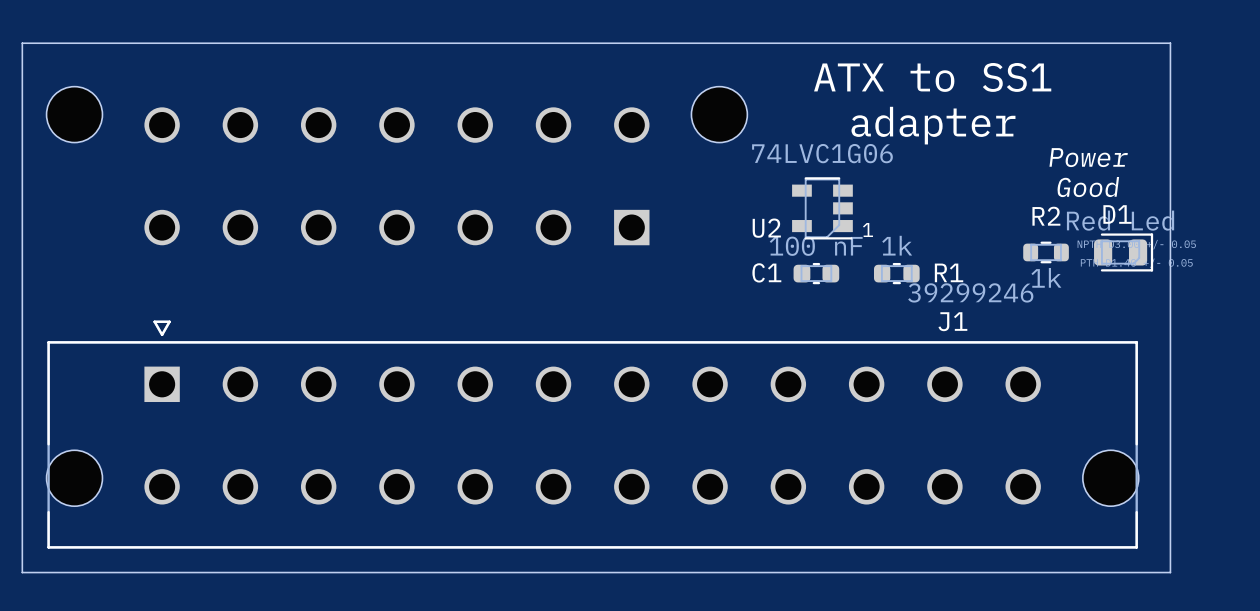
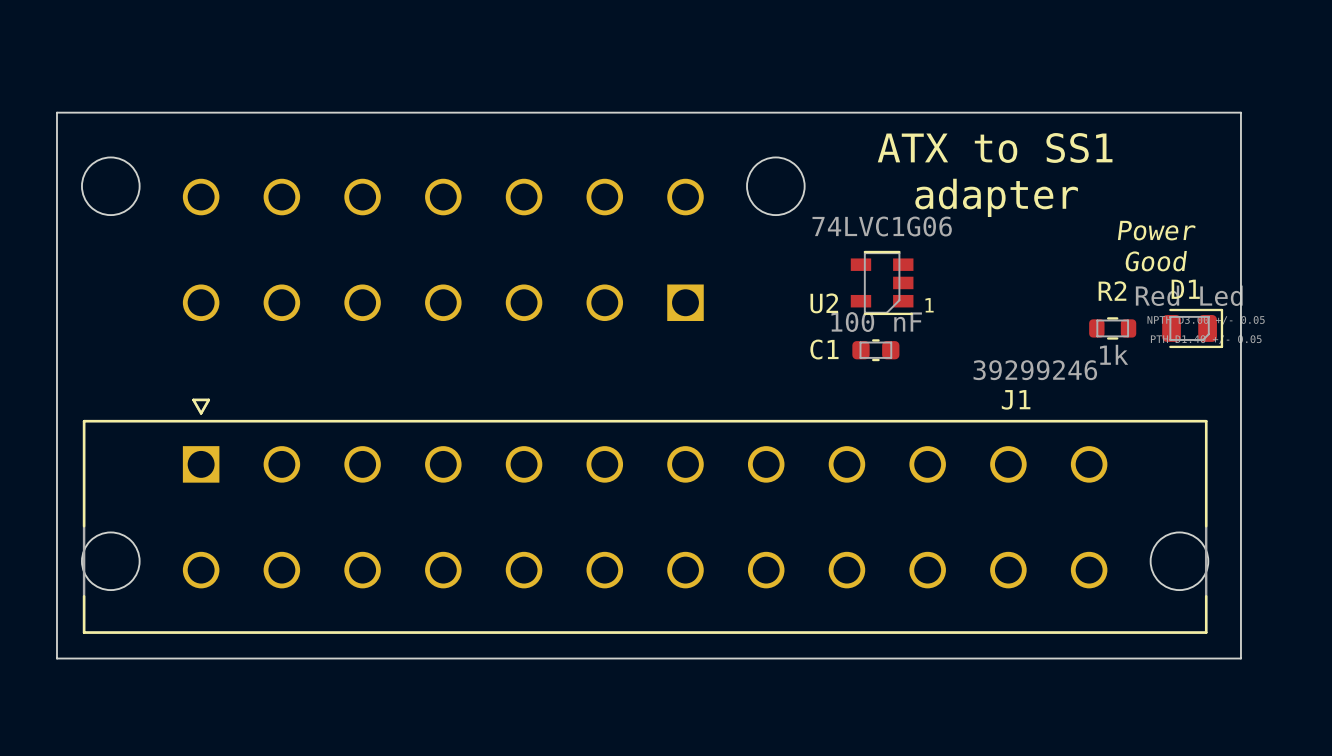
R1: 1k (896, 273) -> none

